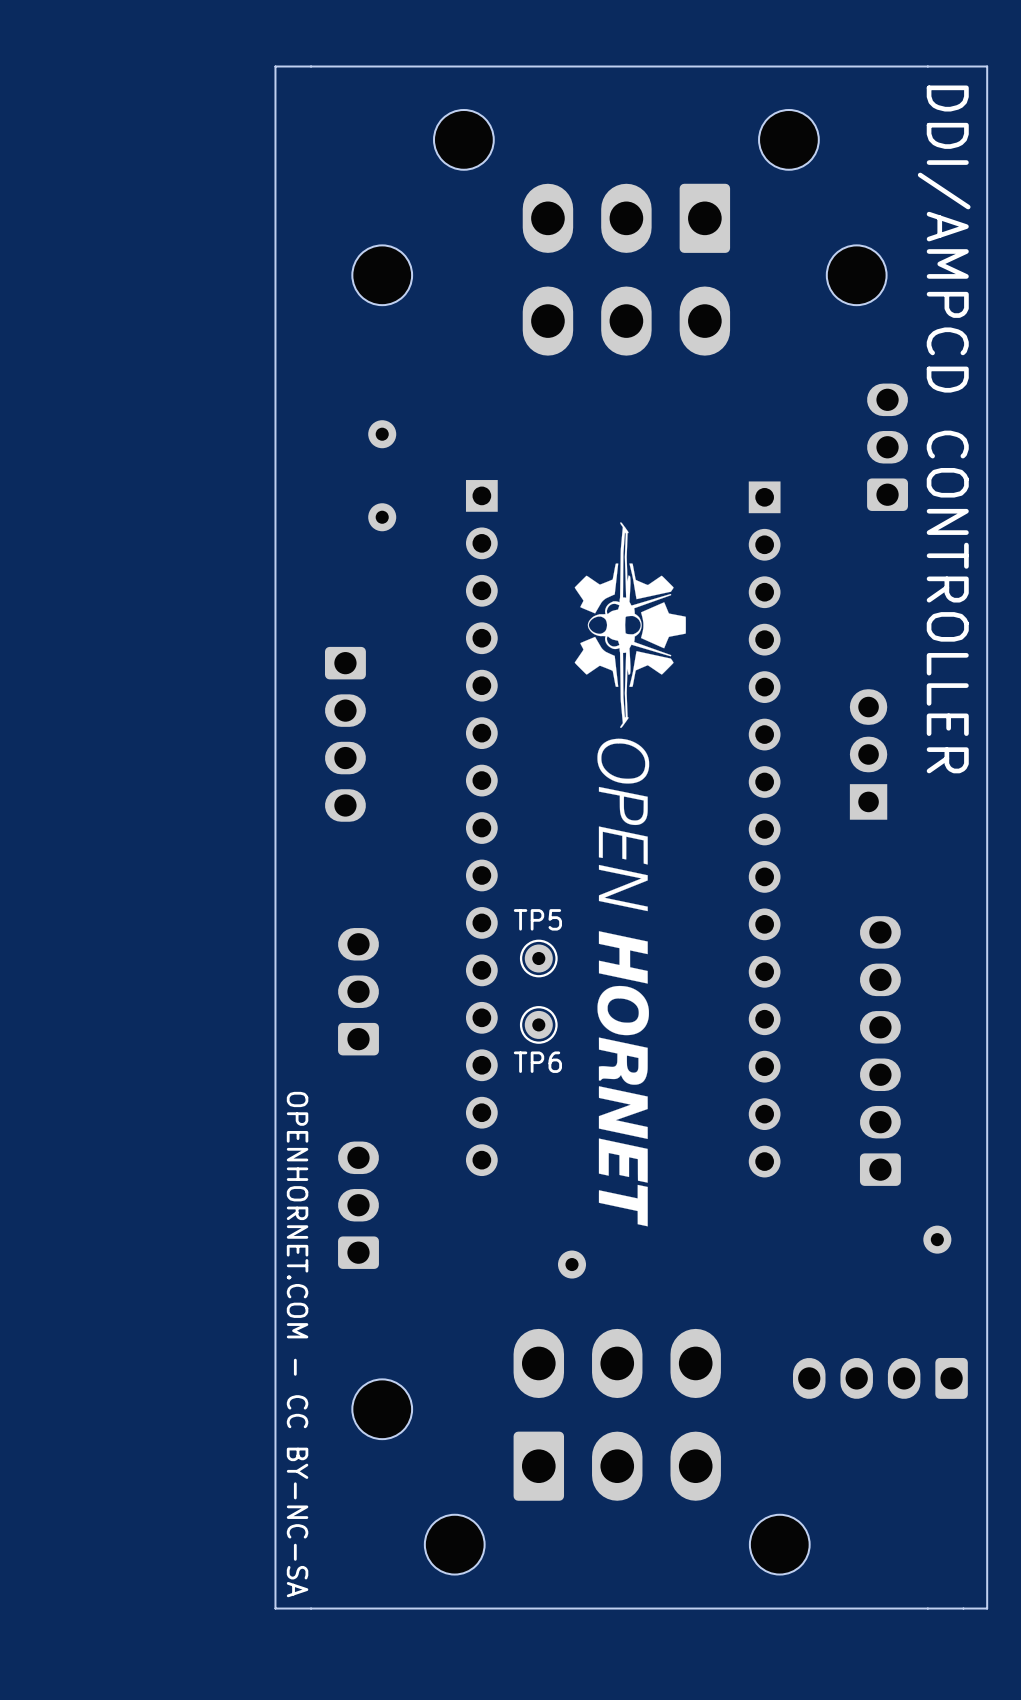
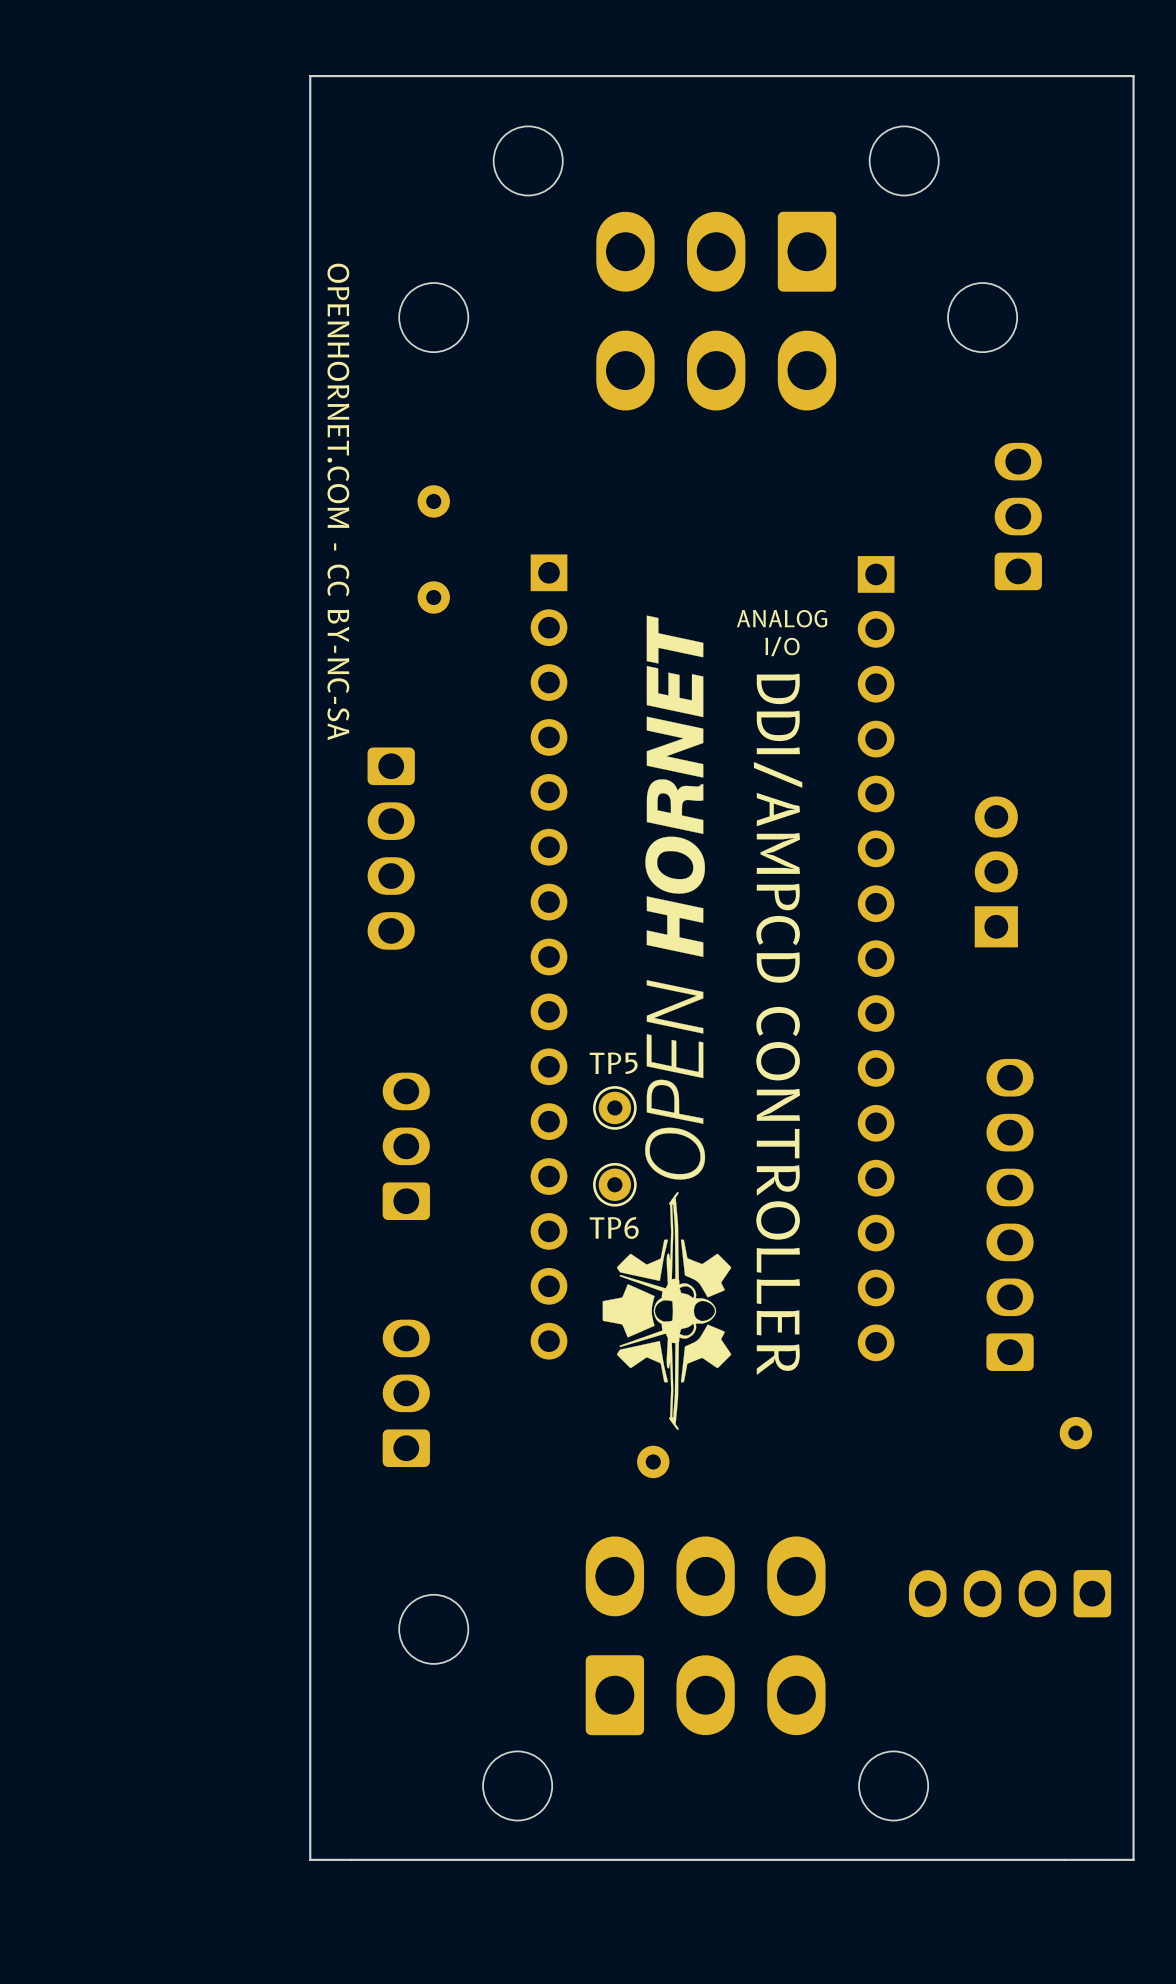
text: DDI/AMPCD CONTROLLER (944, 429) -> none
text: none -> OPENHORNET.COM - CC BY-NC-SA (338, 501)
drawing: [574, 522, 686, 1227] -> none
drawing: none -> [602, 615, 732, 1430]
text: none -> ANALOG (782, 618)
text: none -> I/O (782, 646)
text: none -> DDI/AMPCD CONTROLLER (778, 1024)
text: OPENHORNET.COM - CC BY-NC-SA (297, 1344) -> none

